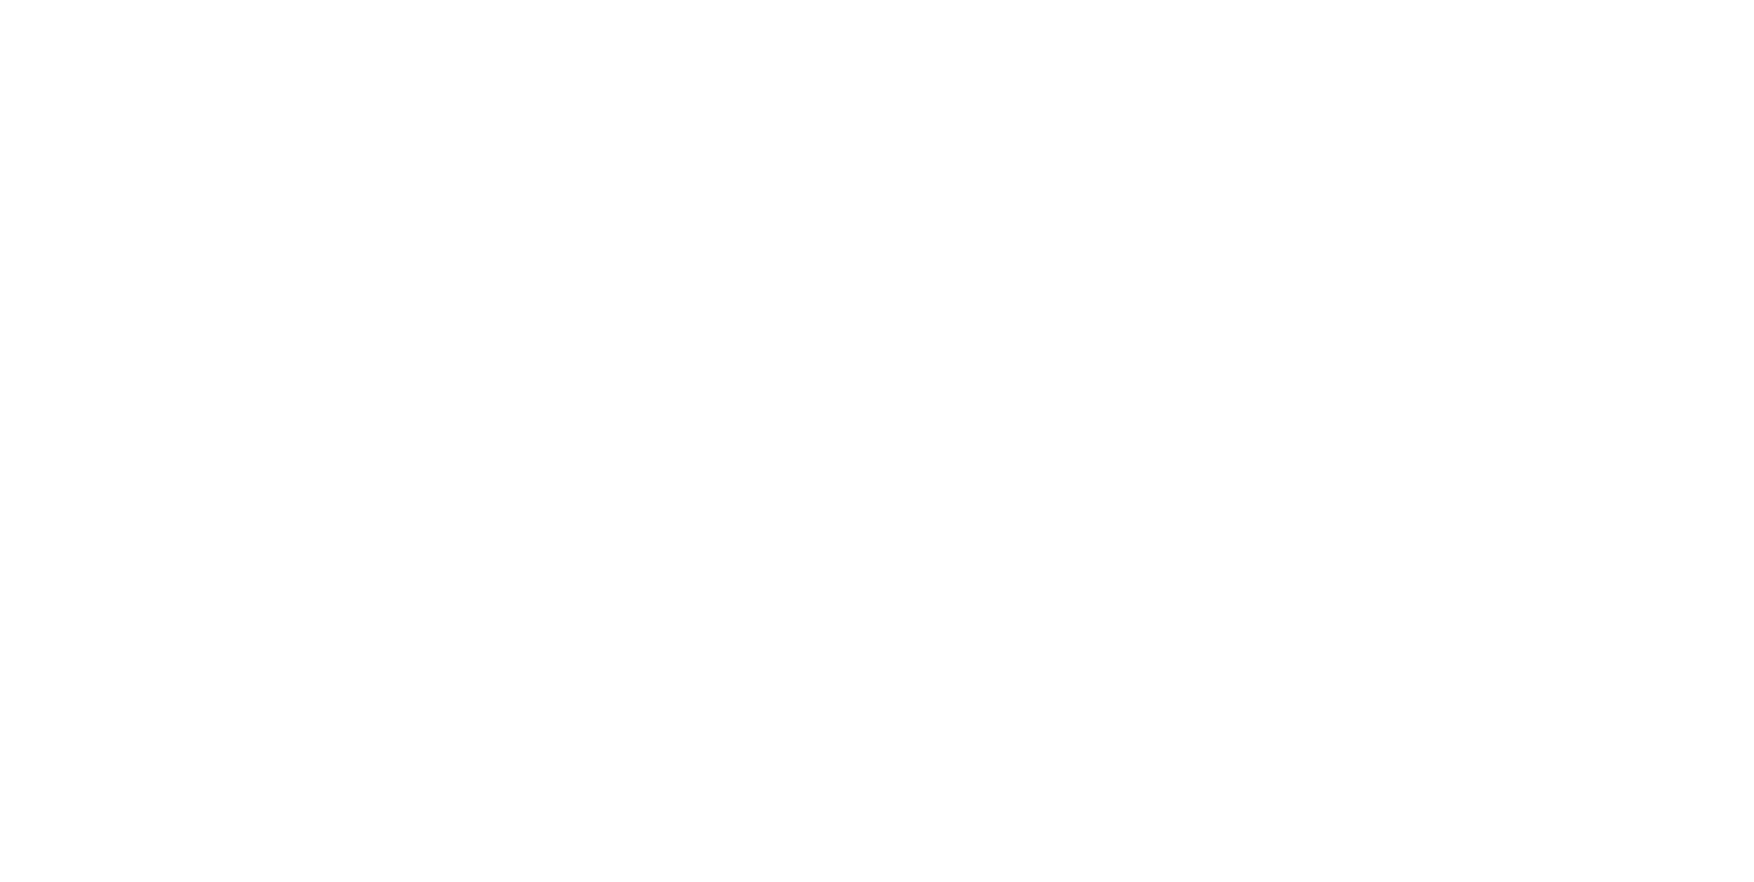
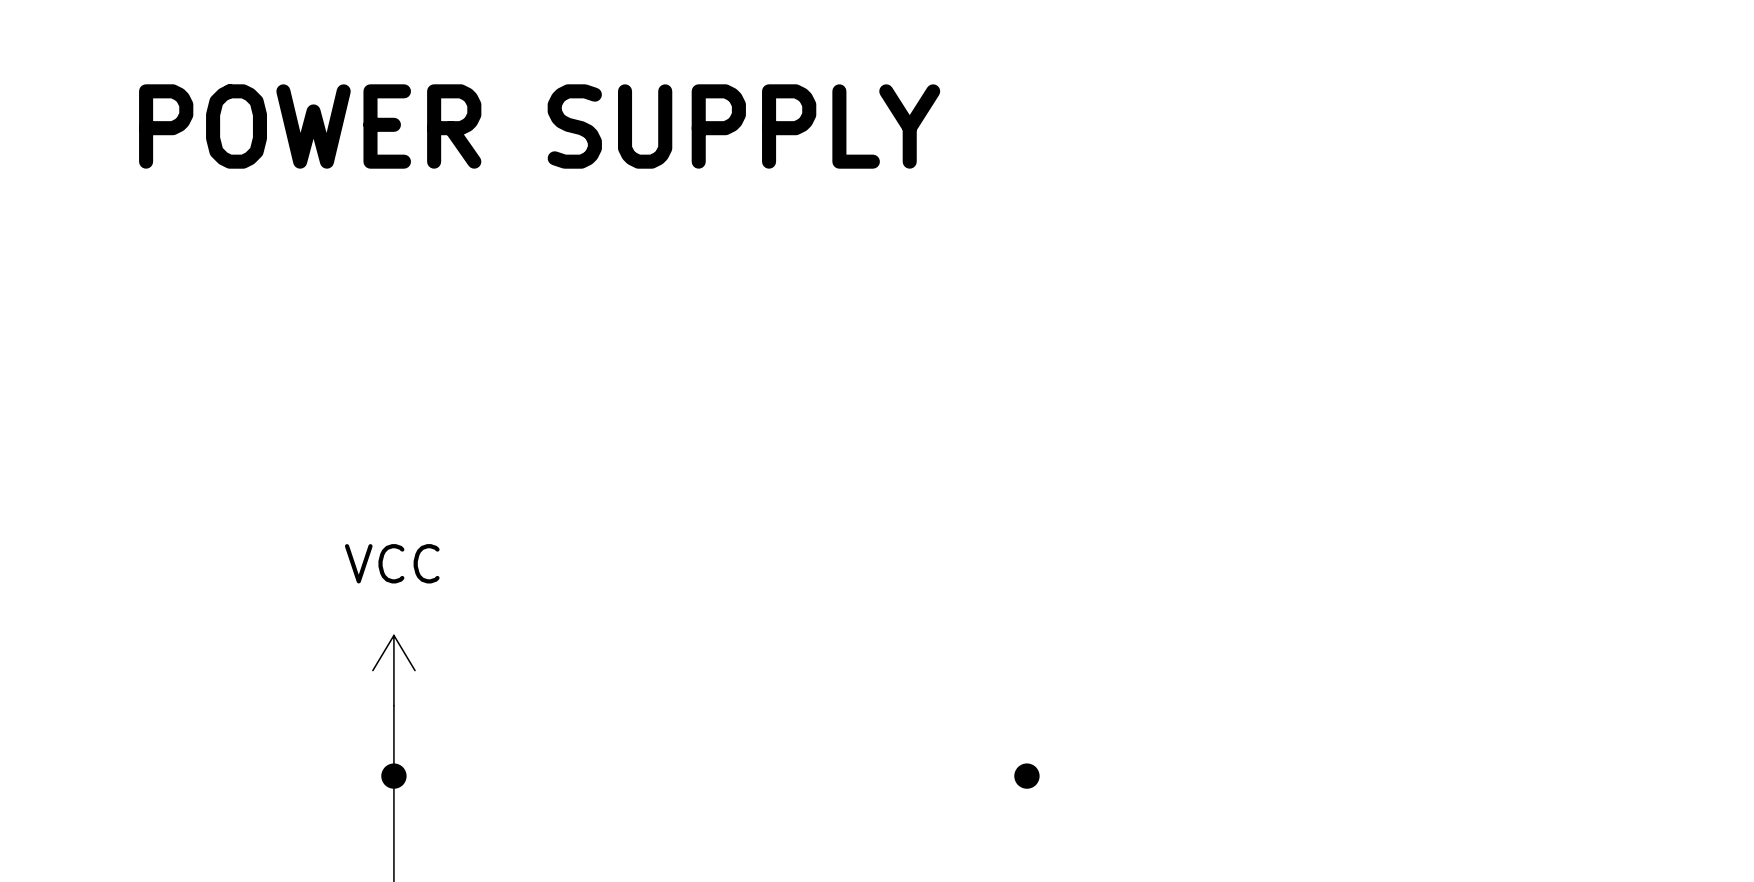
text: none -> POWER SUPPLY (539, 126)
power symbol: none -> VCC (393, 670)
wire: none -> (393, 705) (393, 881)
junction: none -> (393, 776)
junction: none -> (1026, 776)

